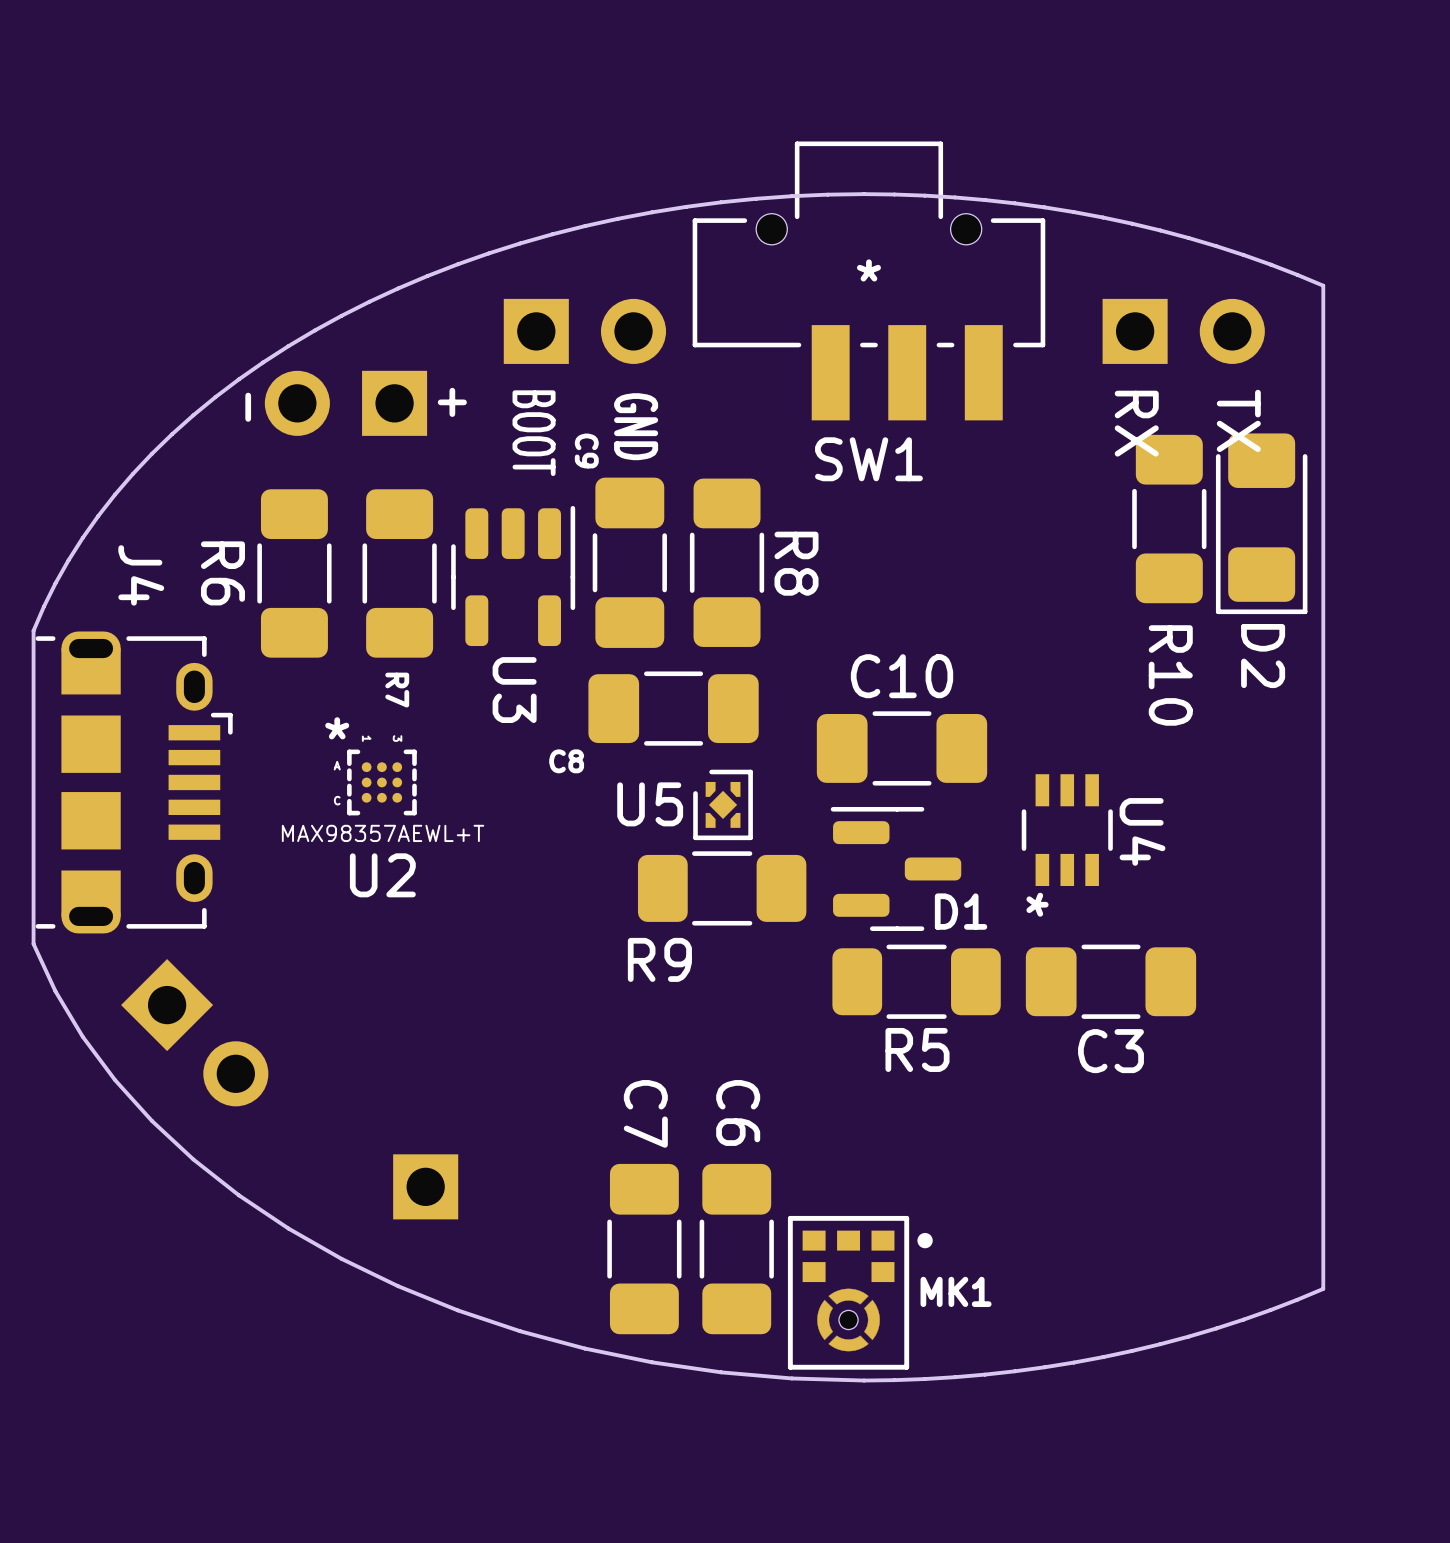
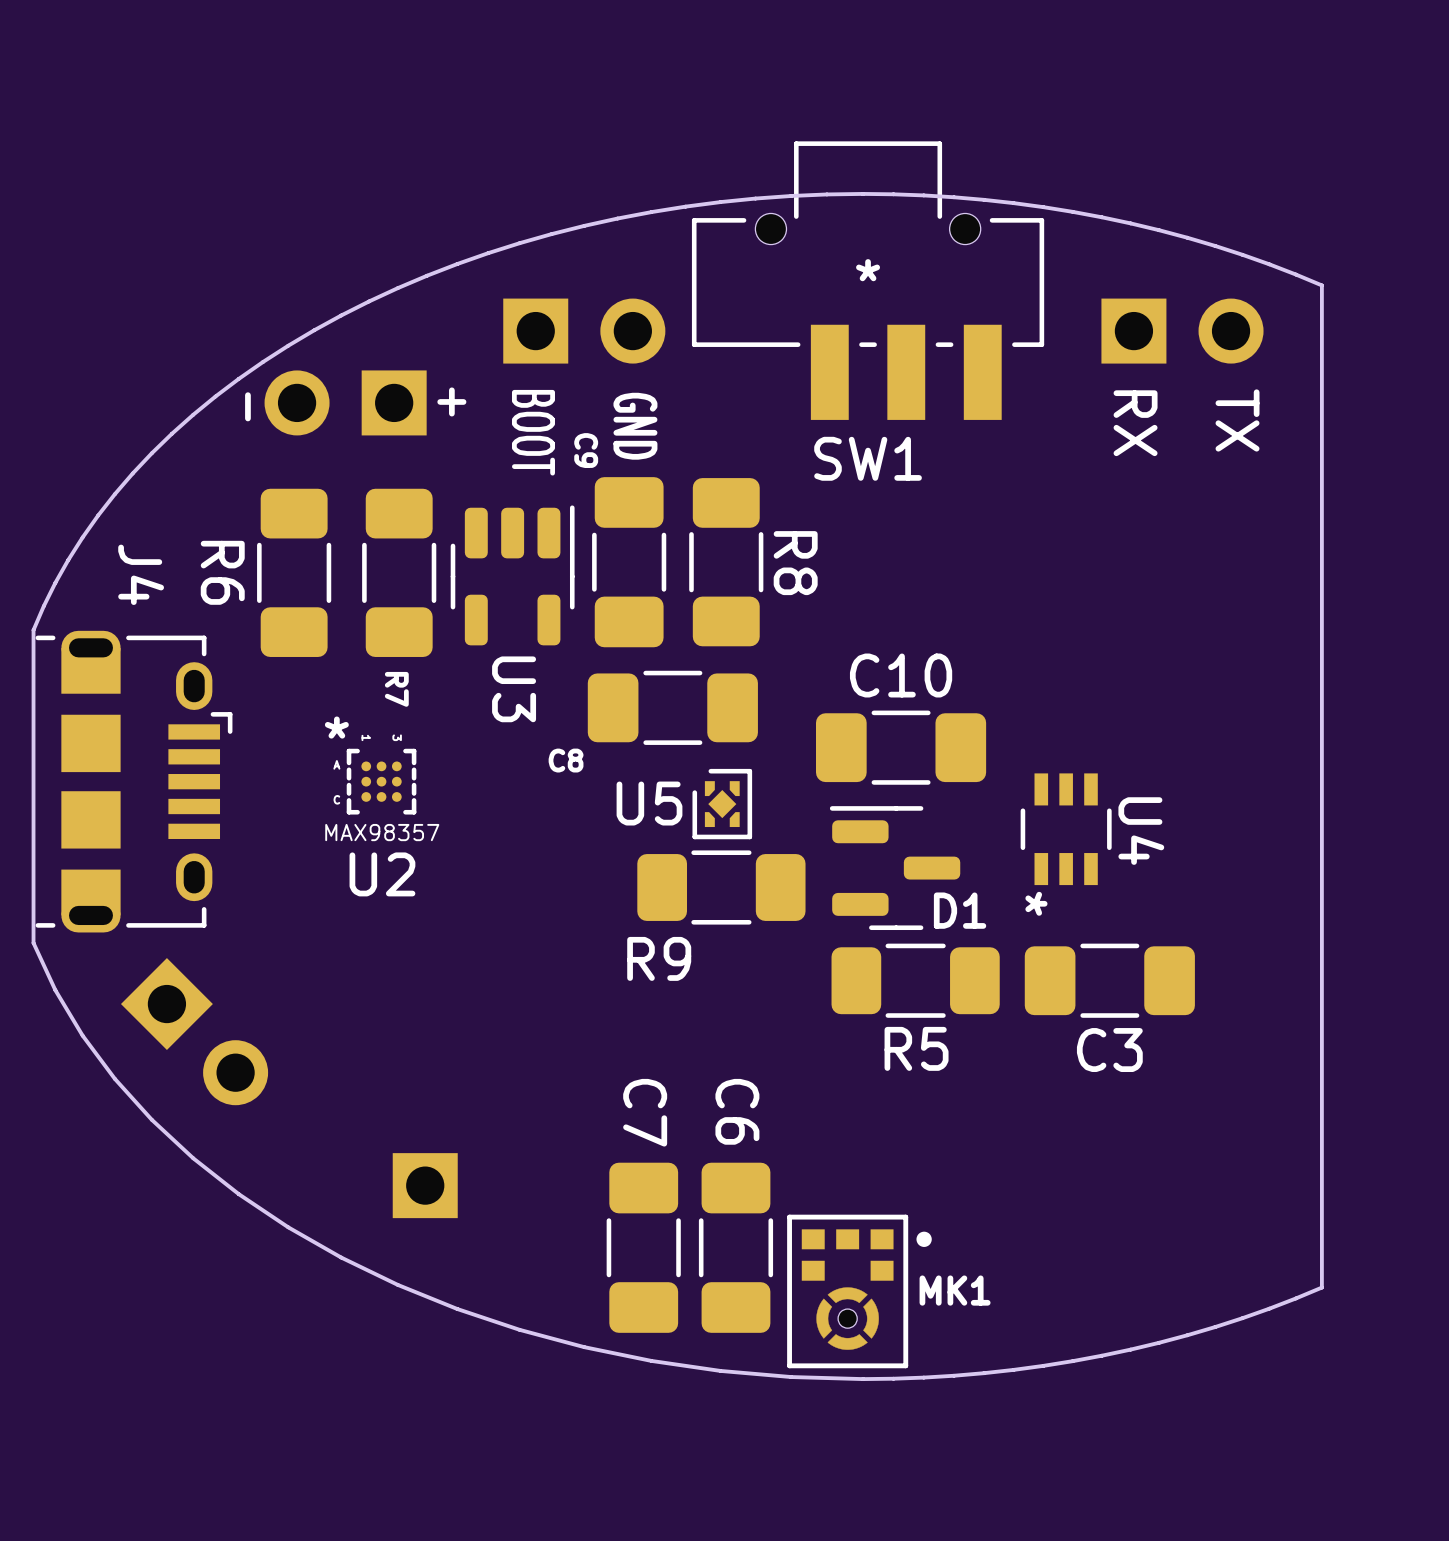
R10: (1169, 519) -> none
D2: (1261, 523) -> none
U2 value: MAX98357AEWL+T (383, 833) -> MAX98357 (382, 832)

